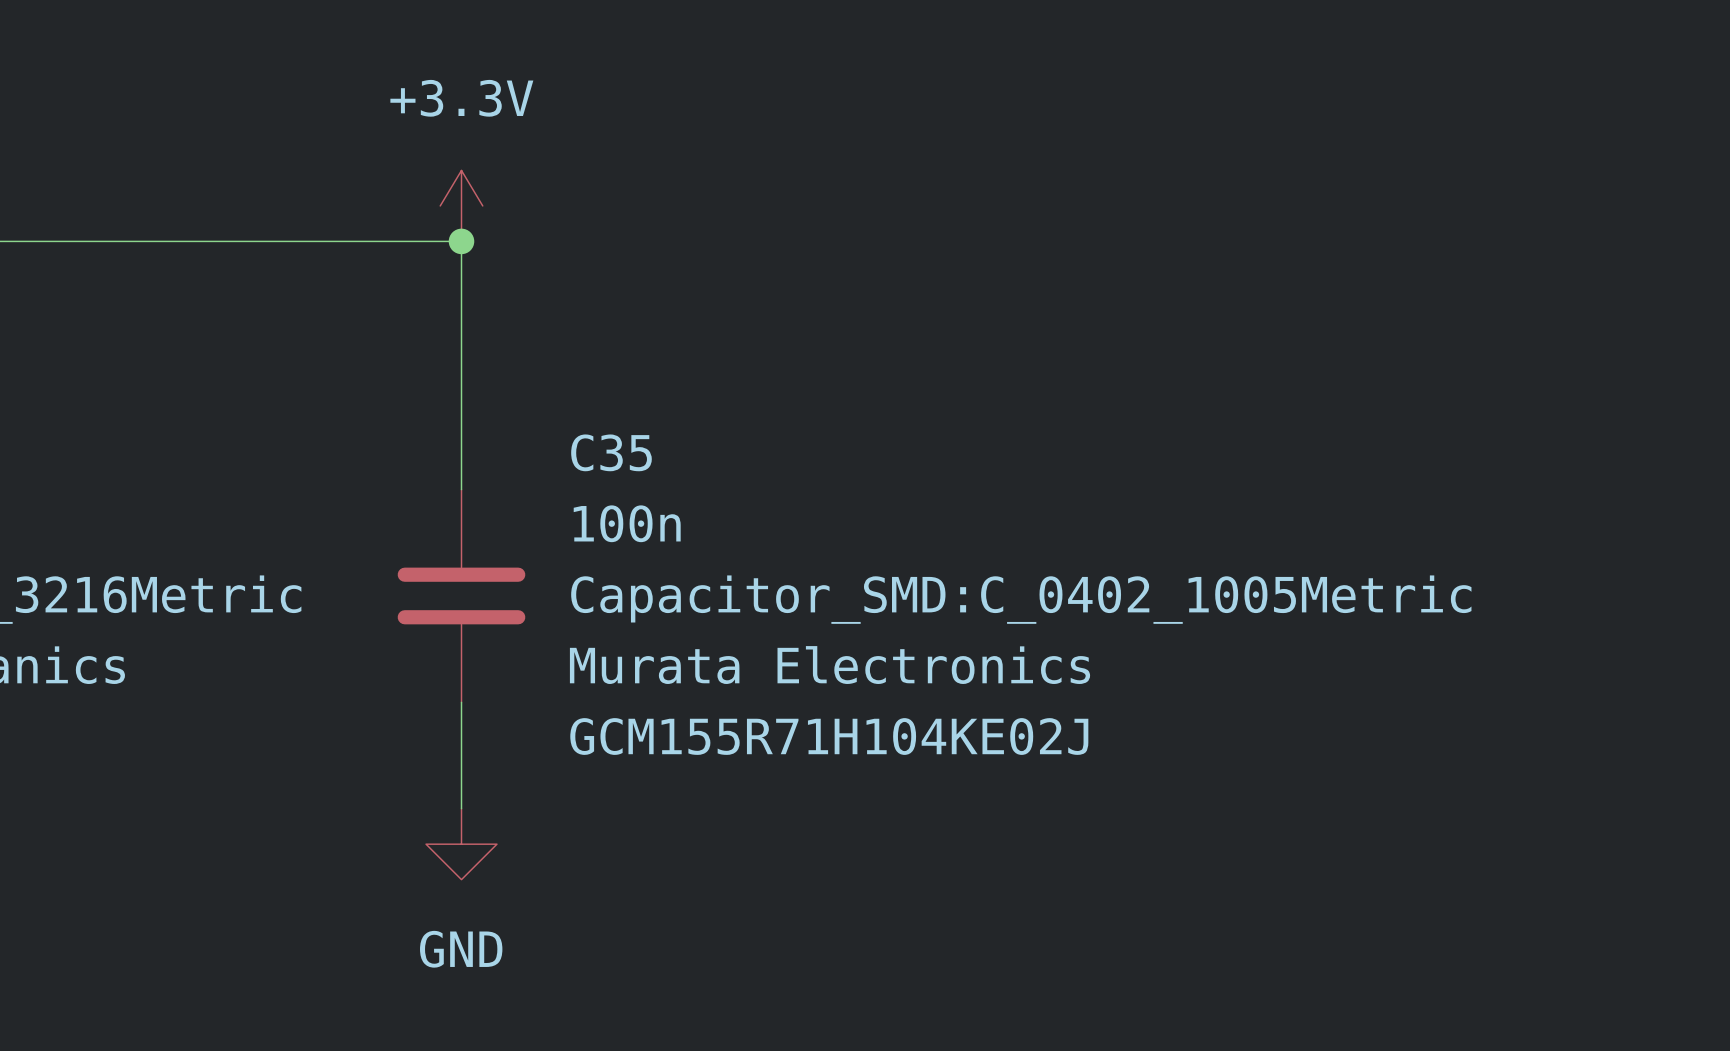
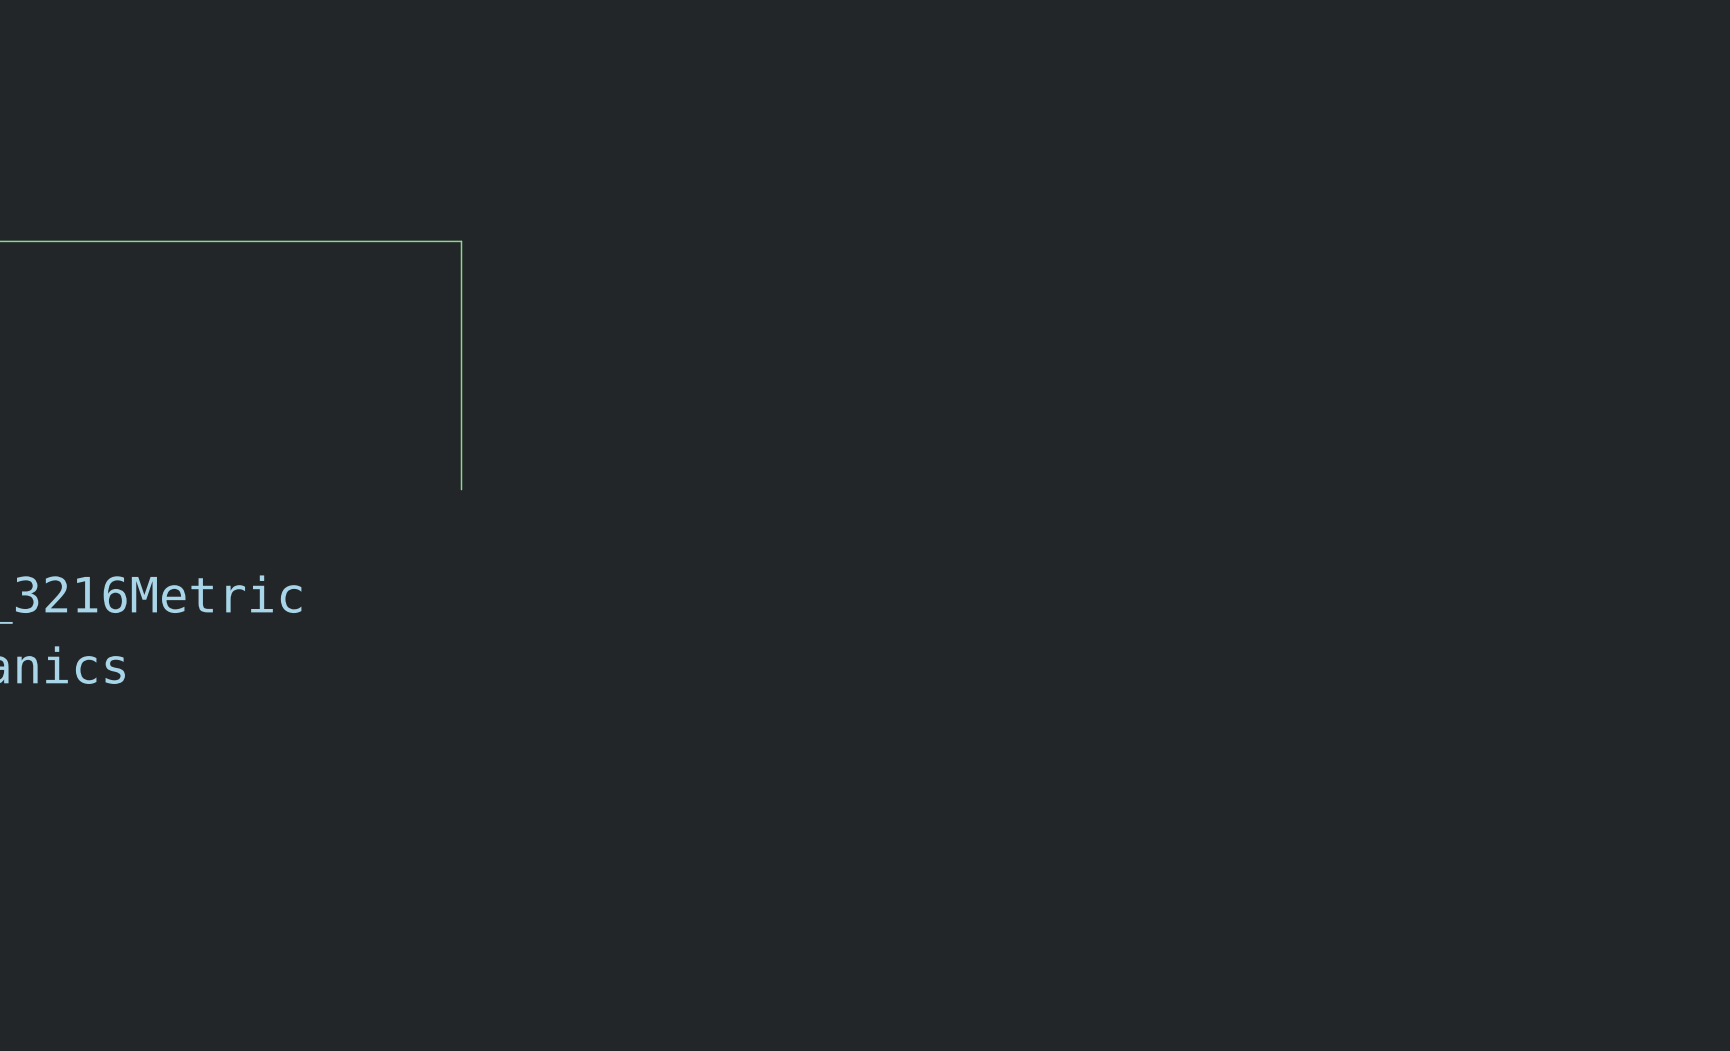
power symbol: +3.3V (461, 205) -> none
junction: (461, 241) -> none
C35: 100n (461, 595) -> none
wire: (461, 702) (461, 808) -> none
power symbol: GND (461, 844) -> none

